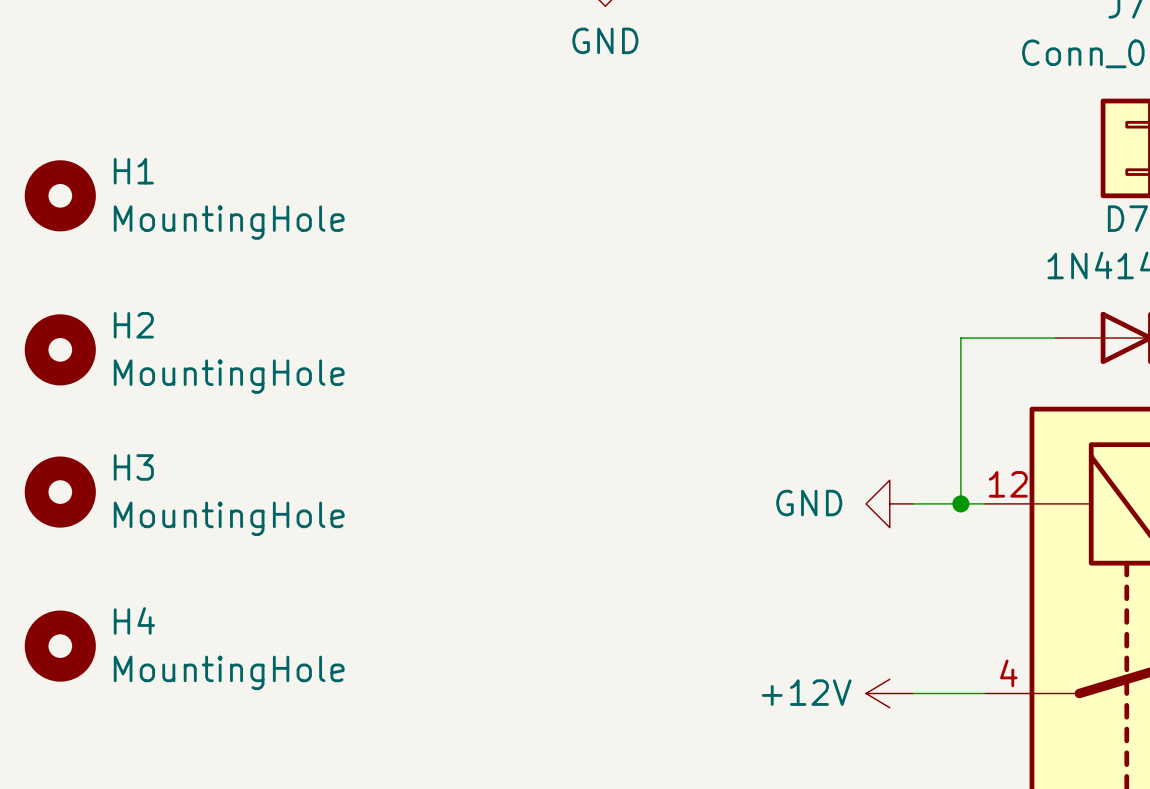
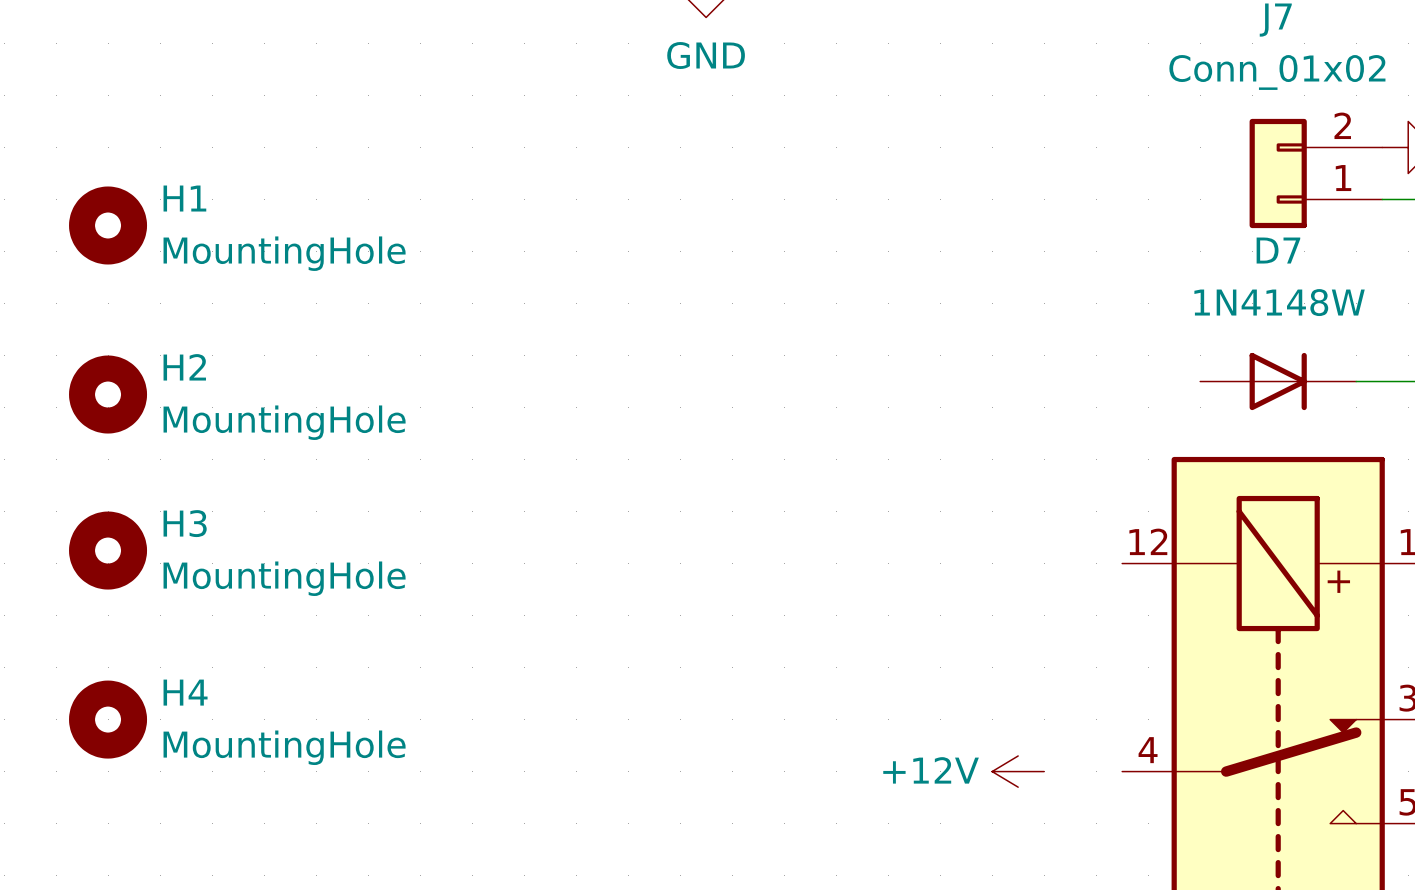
wire: (1055, 338) (960, 338) (960, 503) -> none
power symbol: GND (889, 503) -> none
wire: (913, 503) (984, 503) -> none
junction: (960, 503) -> none
wire: (913, 693) (984, 693) -> none

